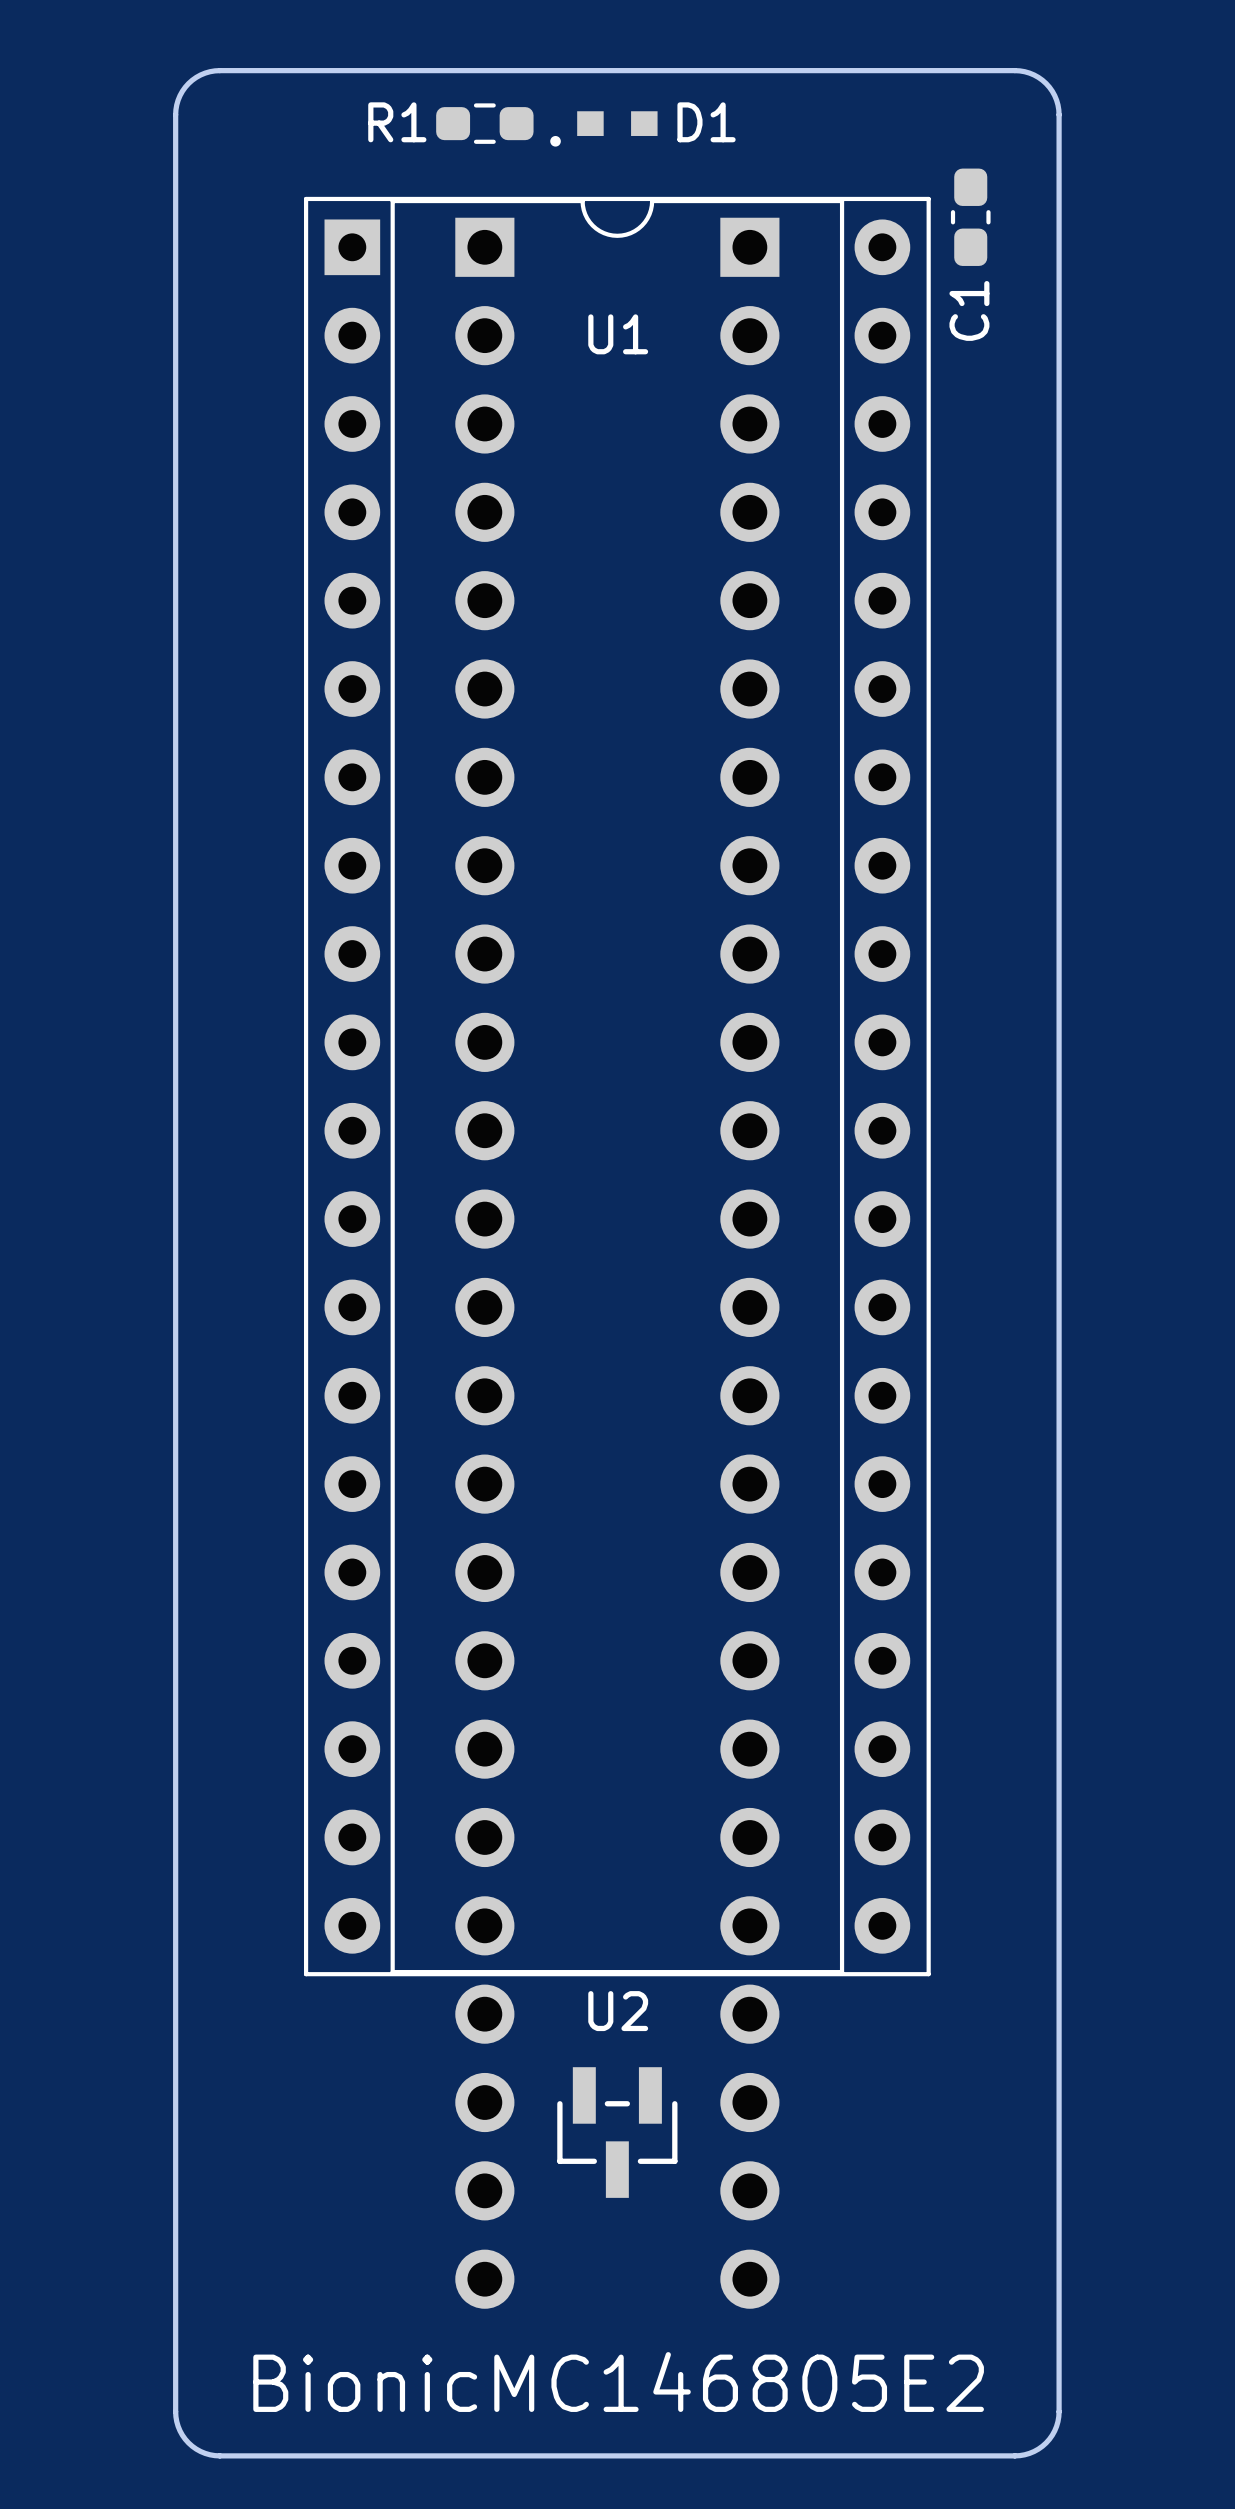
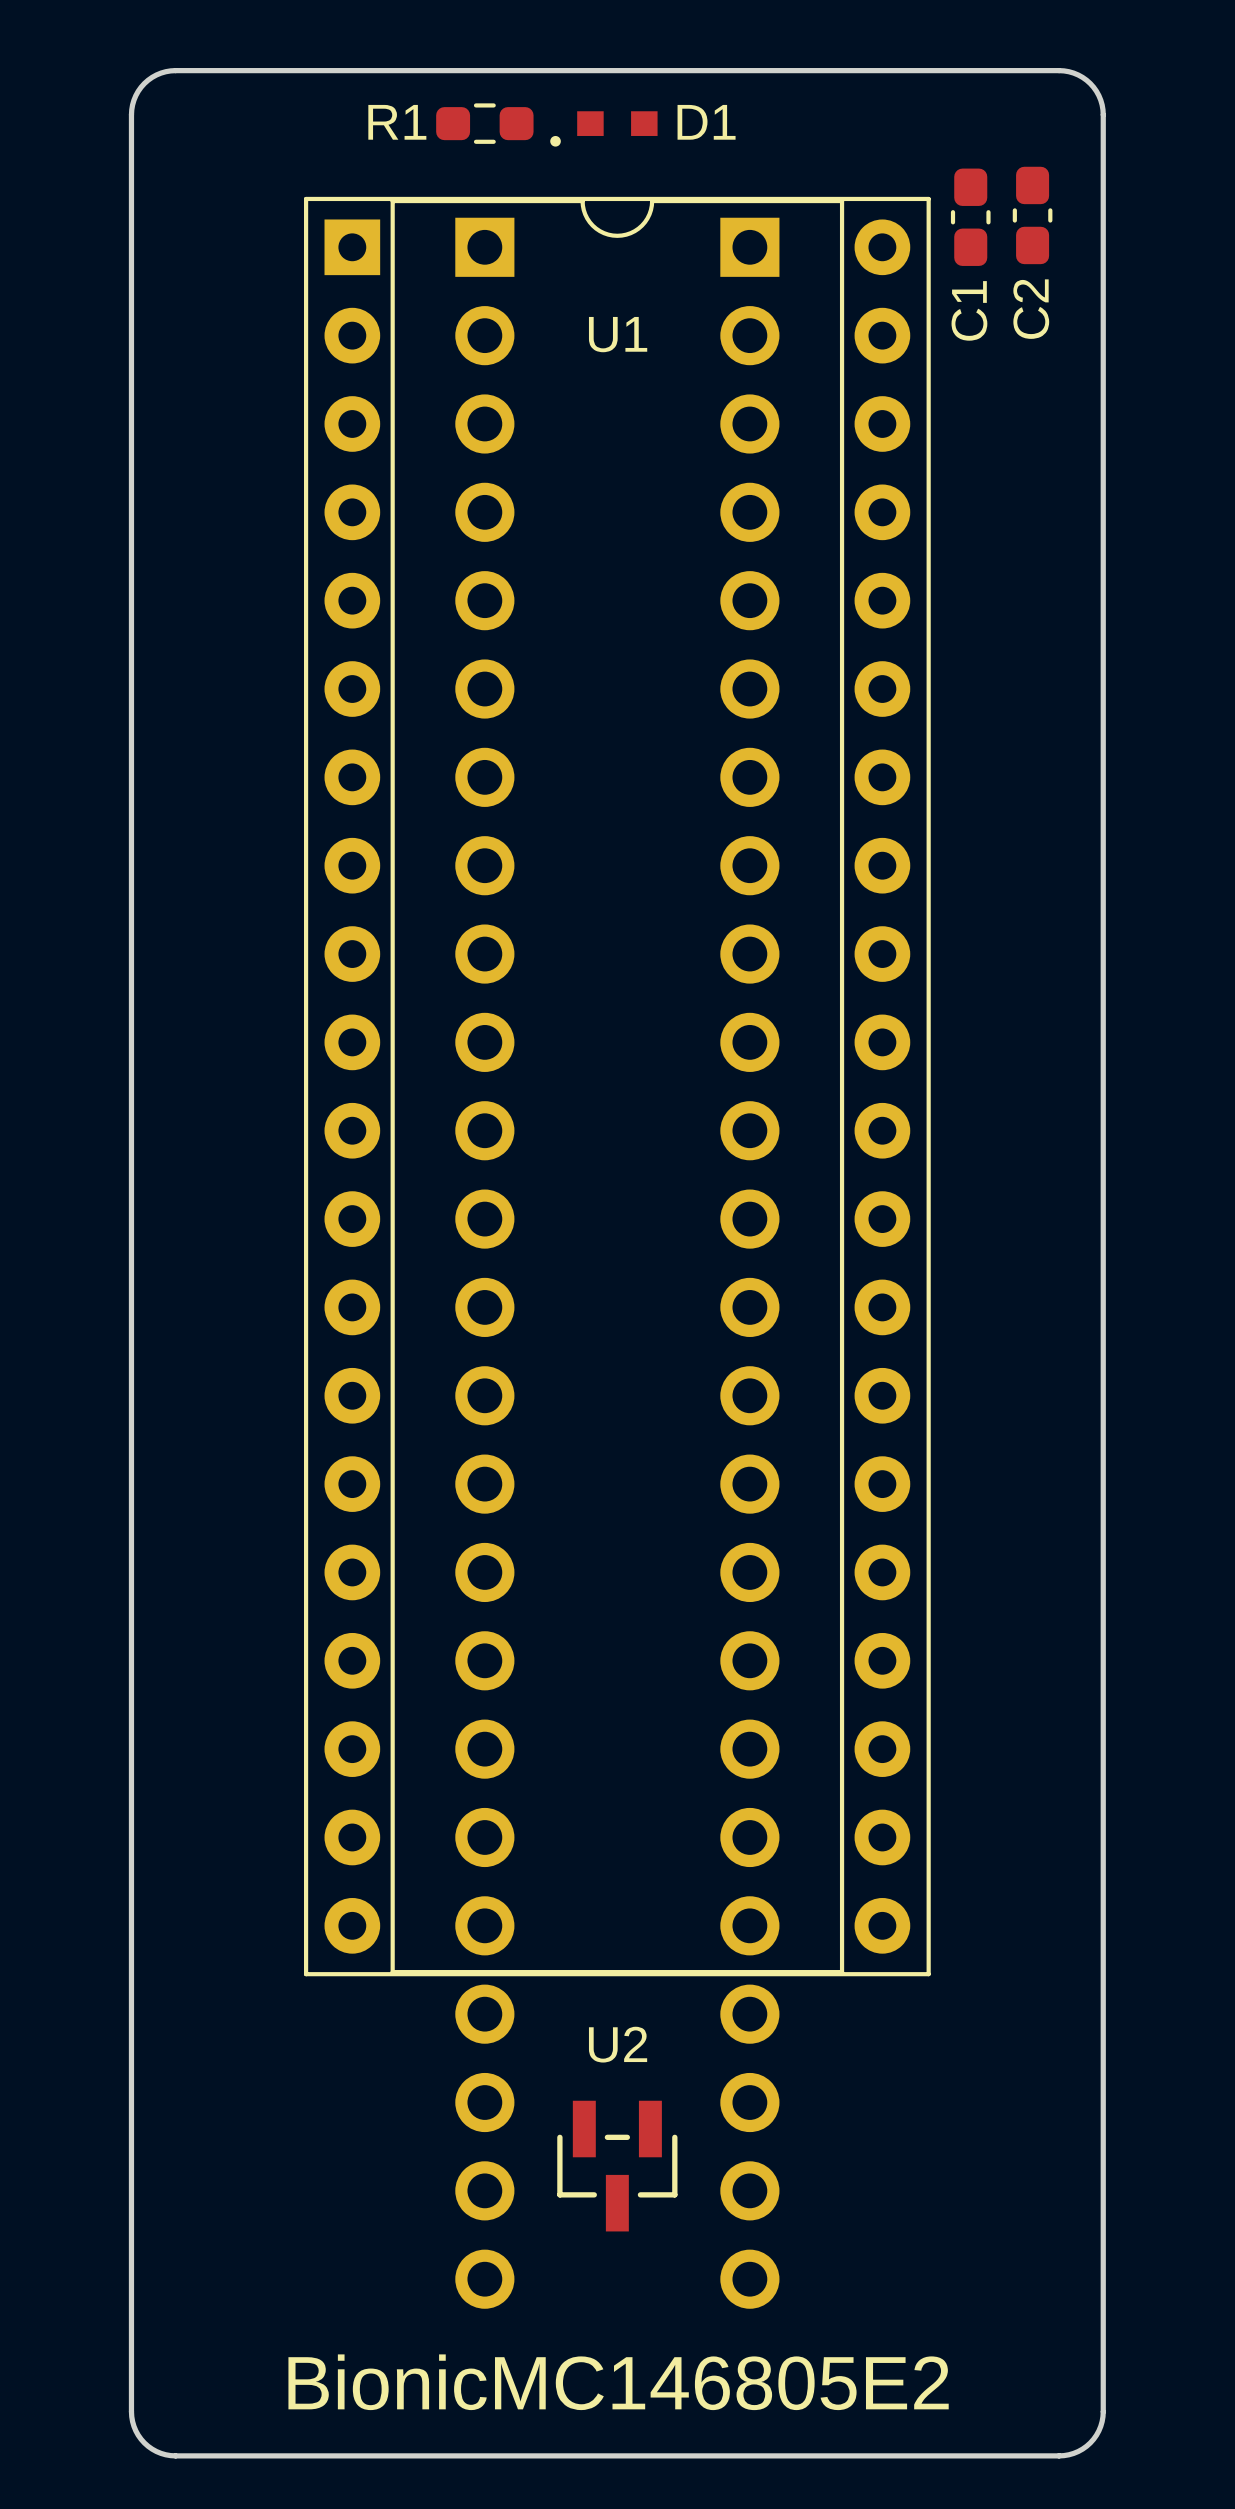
board edge: (219, 70) (205, 73) (188, 83) (178, 100) (175, 114) (175, 2411) (178, 2426) (188, 2442) (205, 2453) (219, 2455) -> (219, 70) (170, 70) (156, 74) (148, 80) (138, 91) (132, 104) (131, 114) (131, 2411) (132, 2421) (138, 2435) (144, 2442) (156, 2451) (170, 2455) (219, 2455)
board edge: (1014, 70) (1029, 73) (1046, 83) (1056, 100) (1059, 114) (1059, 2411) (1056, 2426) (1046, 2442) (1029, 2453) (1014, 2455) -> (1014, 70) (1064, 70) (1078, 74) (1086, 80) (1096, 91) (1102, 104) (1103, 114) (1103, 2411) (1102, 2421) (1096, 2435) (1086, 2446) (1078, 2451) (1064, 2455) (1014, 2455)
C2: none -> (1032, 215)
U2 position: (617, 2132) -> (617, 2166)

